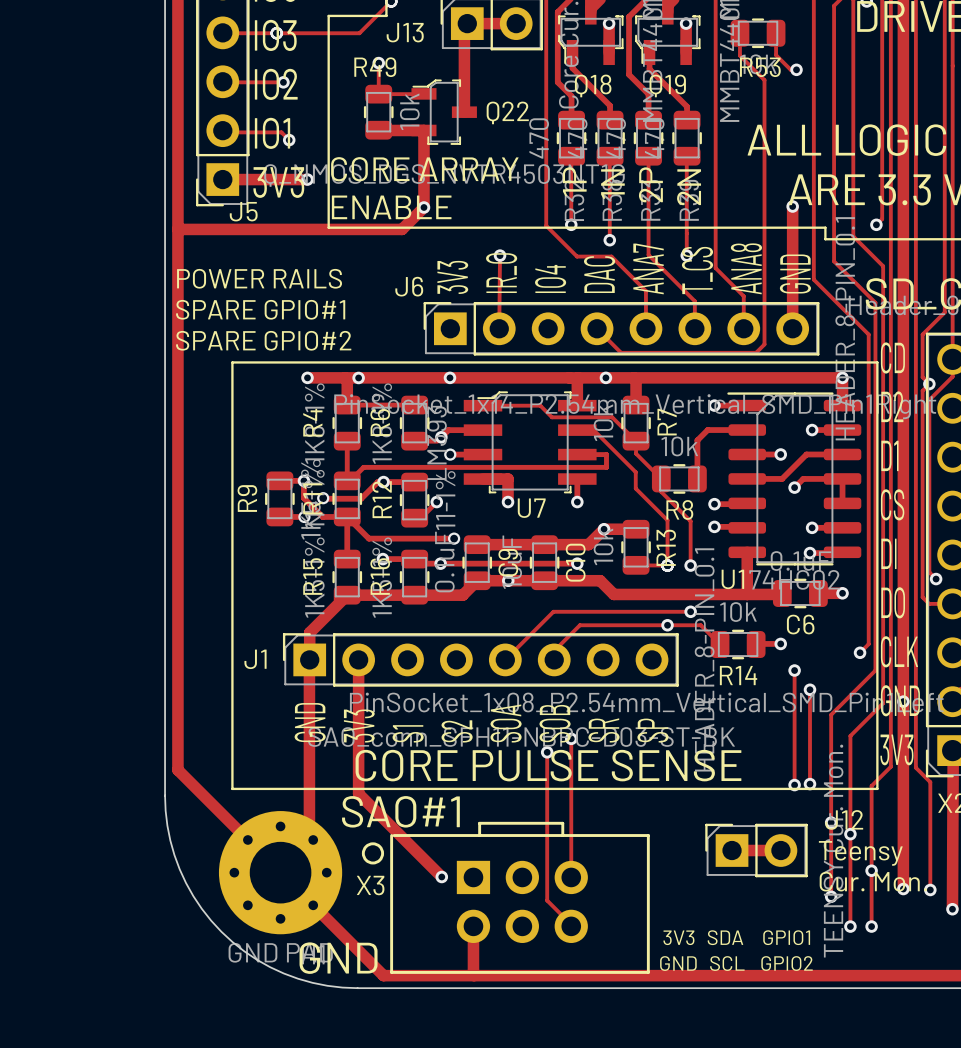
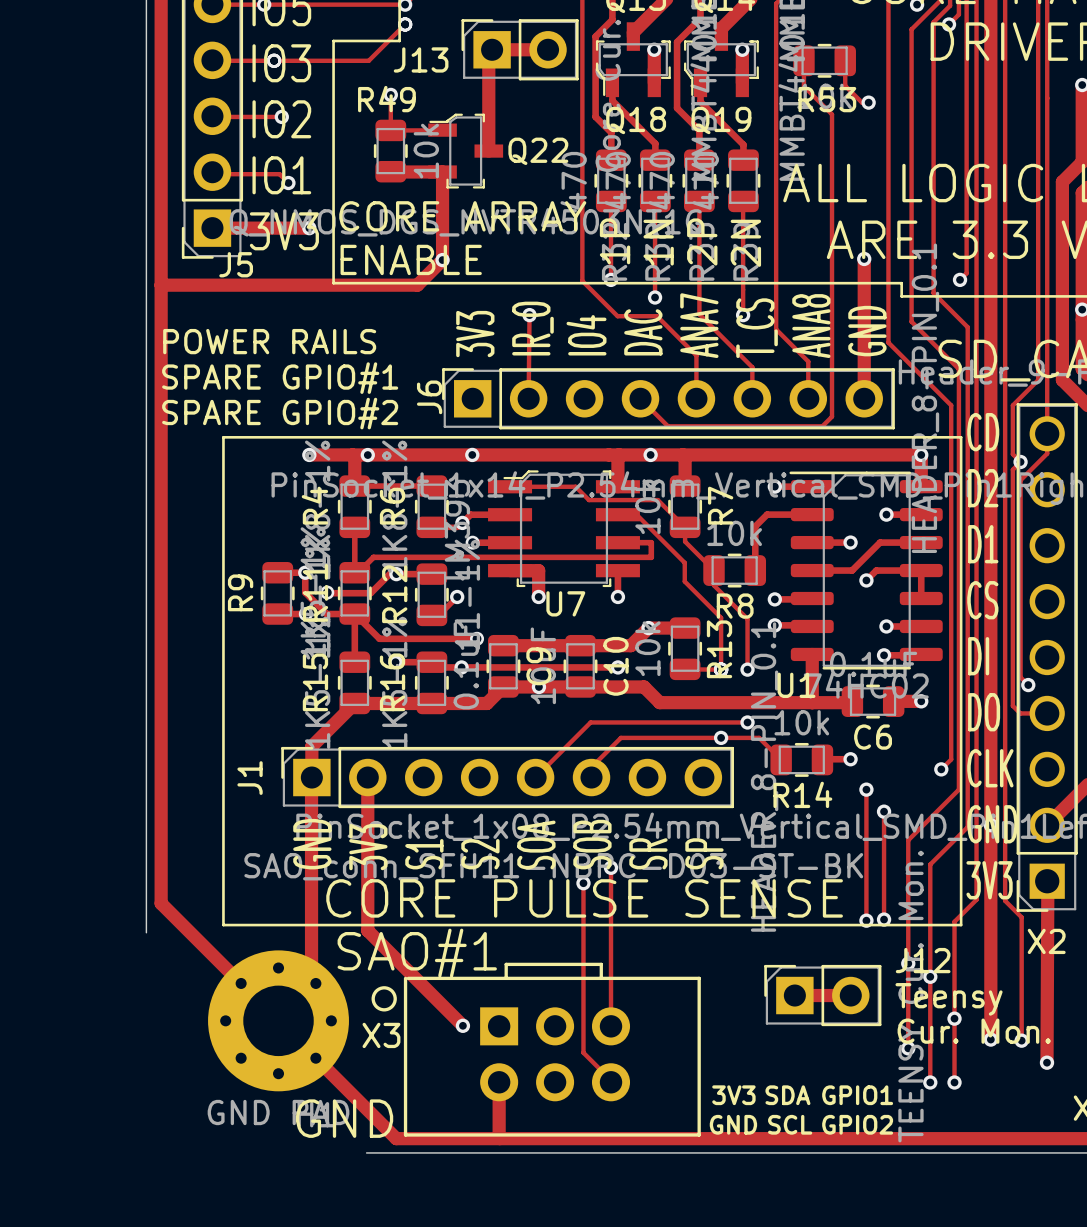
J6 name rotation: 0° (409, 286) -> 90° counterclockwise (429, 397)
J1 name rotation: 0° (255, 659) -> 90° counterclockwise (250, 778)
board edge: (165, 795) (170, 840) (179, 869) (193, 896) (221, 931) (244, 951) (283, 973) (327, 985) (357, 988) -> none

